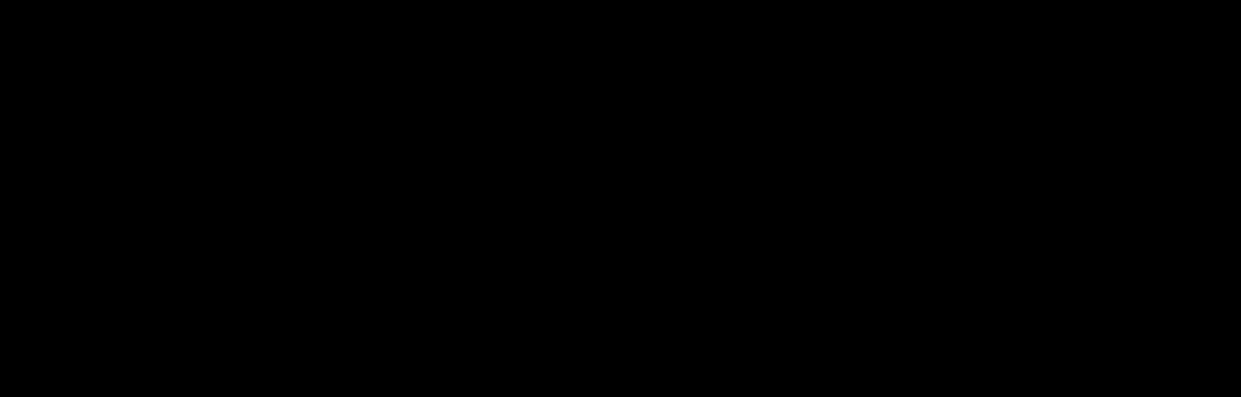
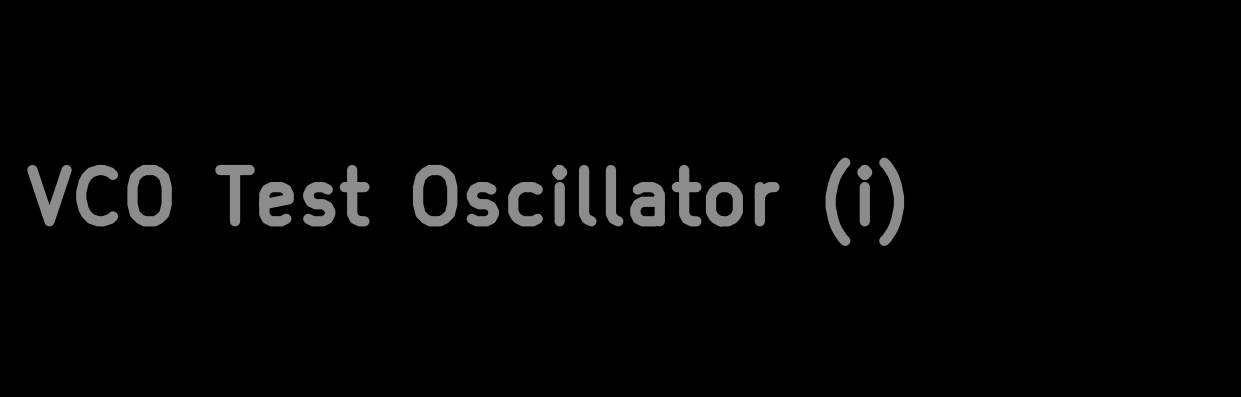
text: none -> VCO Test Oscillator (i) (465, 201)

